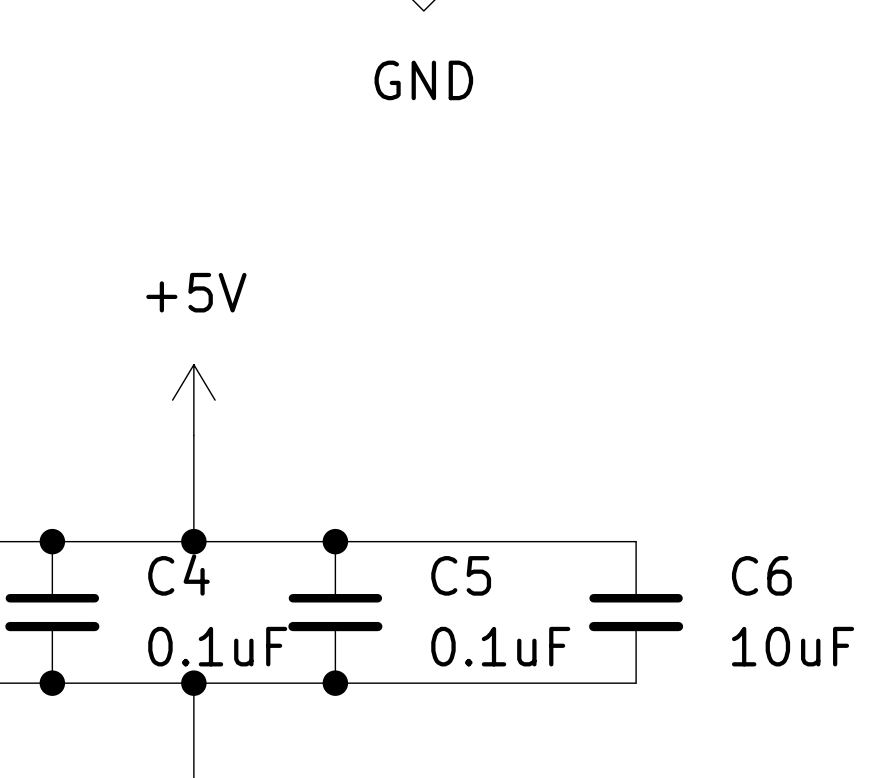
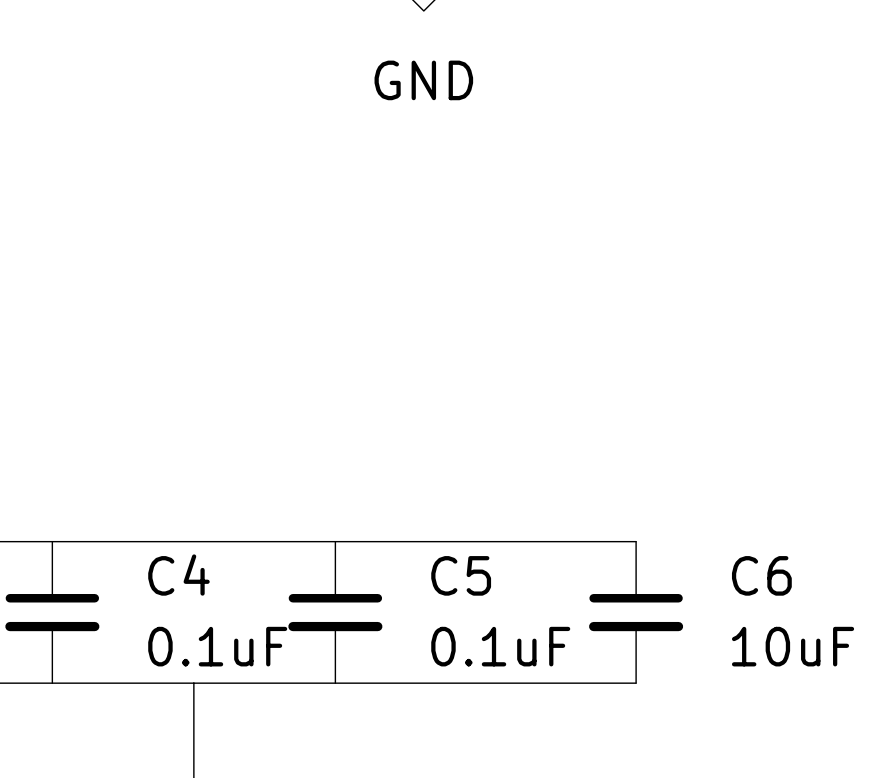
power symbol: +5V (193, 400) -> none
wire: (193, 435) (193, 541) -> none
junction: (52, 541) -> none
junction: (193, 541) -> none
junction: (335, 541) -> none
junction: (52, 683) -> none
junction: (193, 683) -> none
junction: (335, 683) -> none

